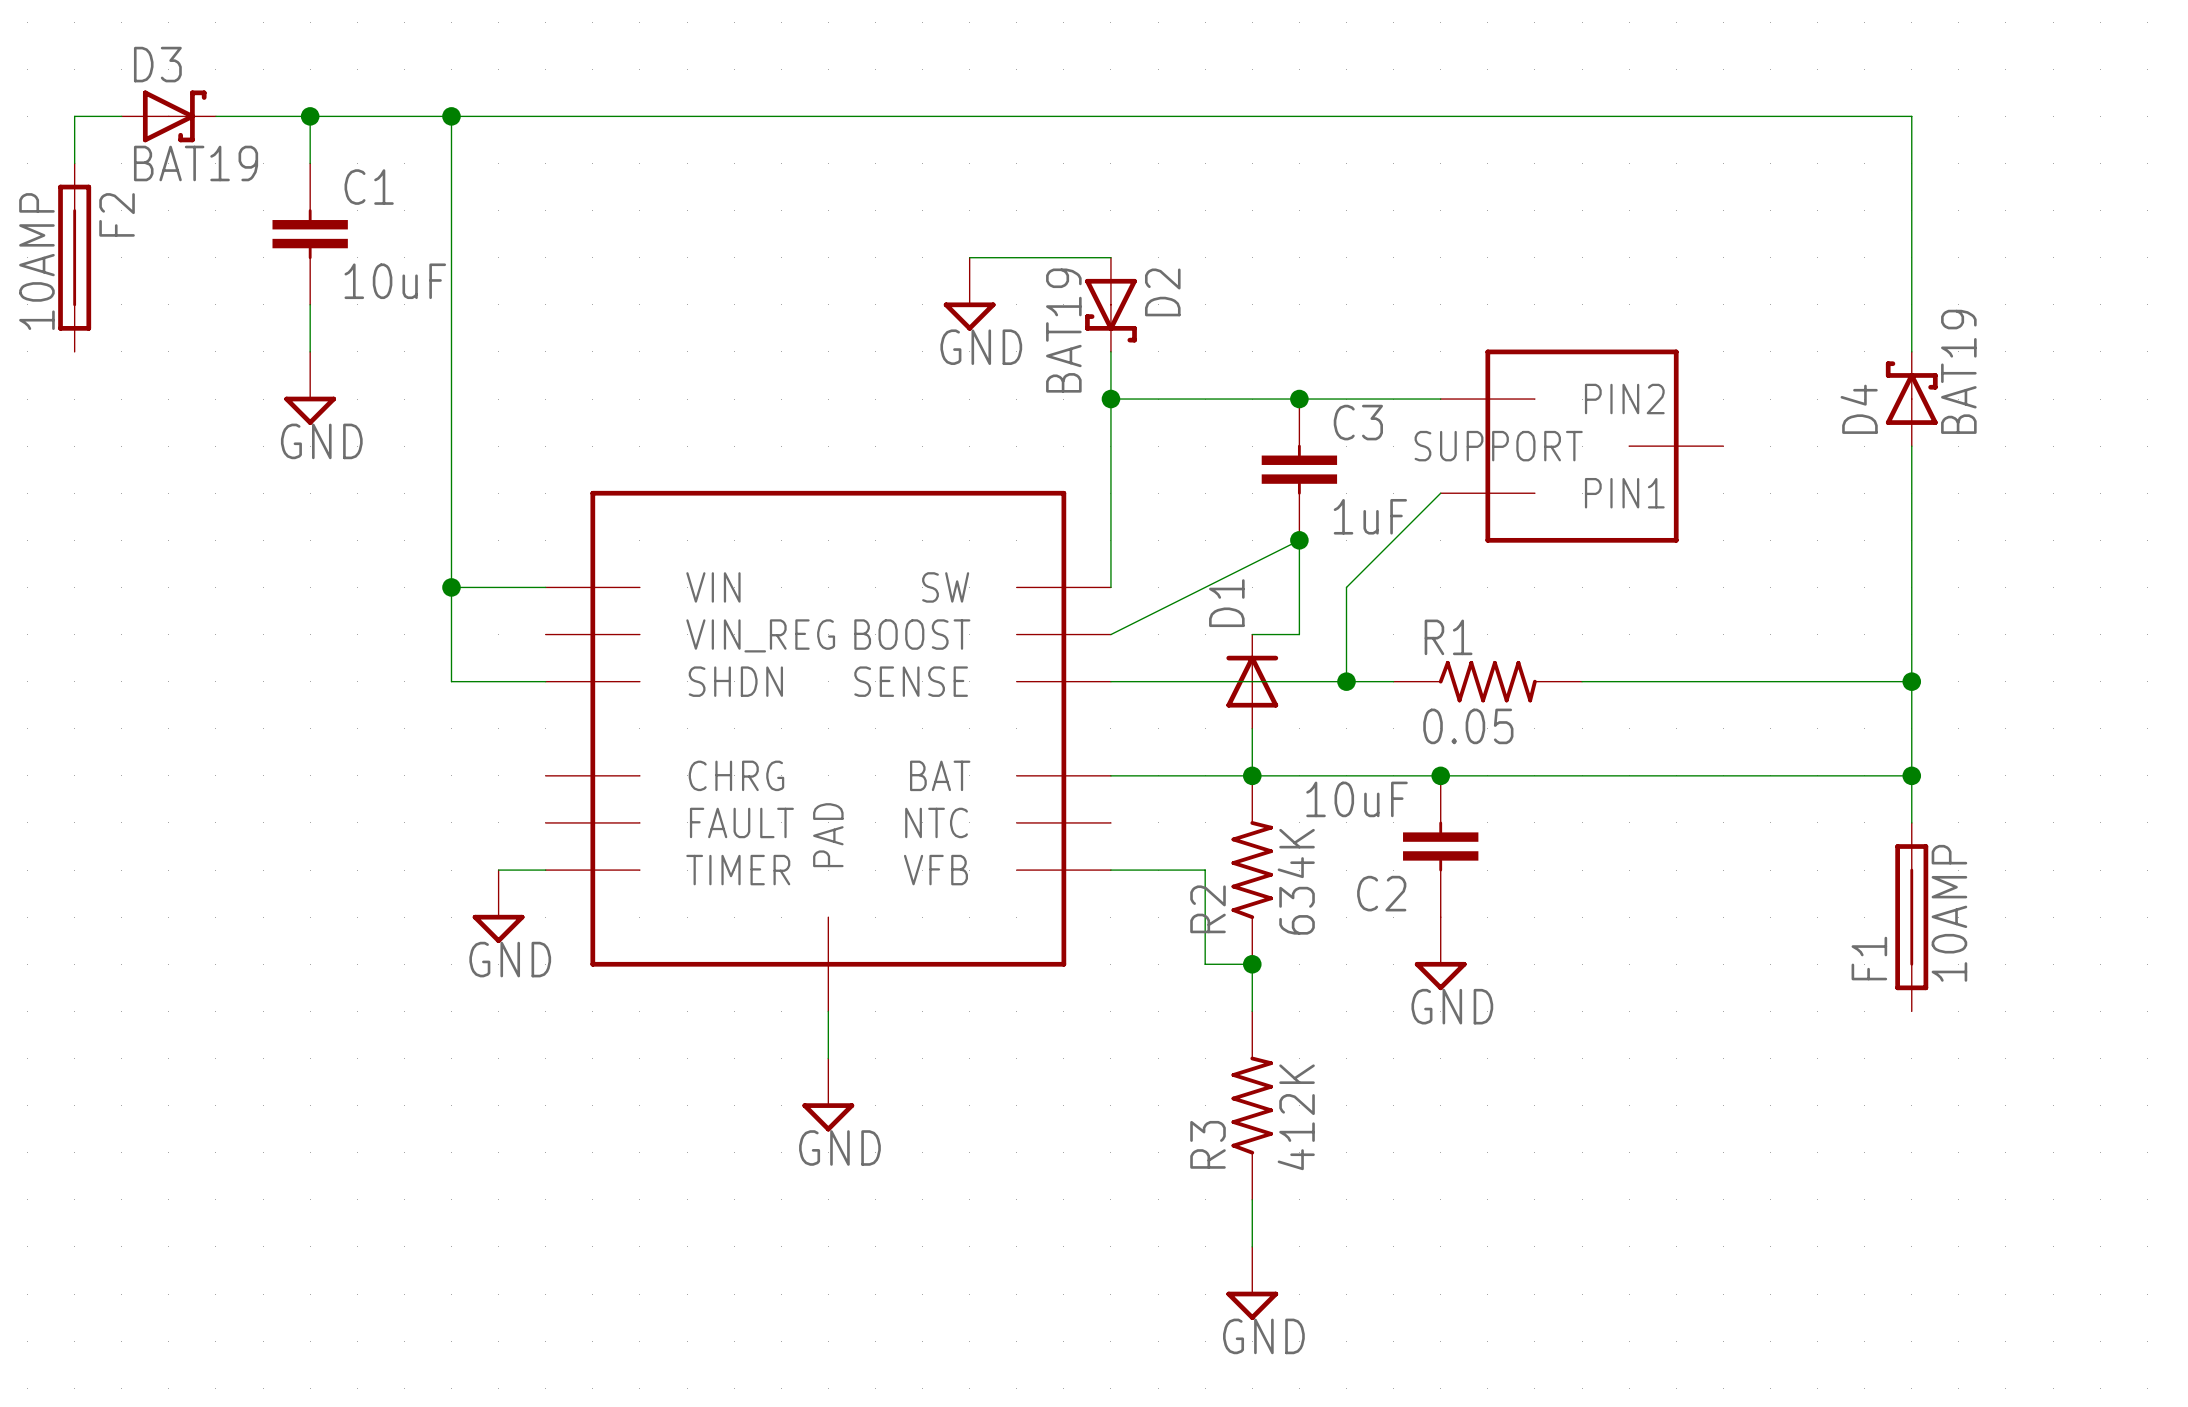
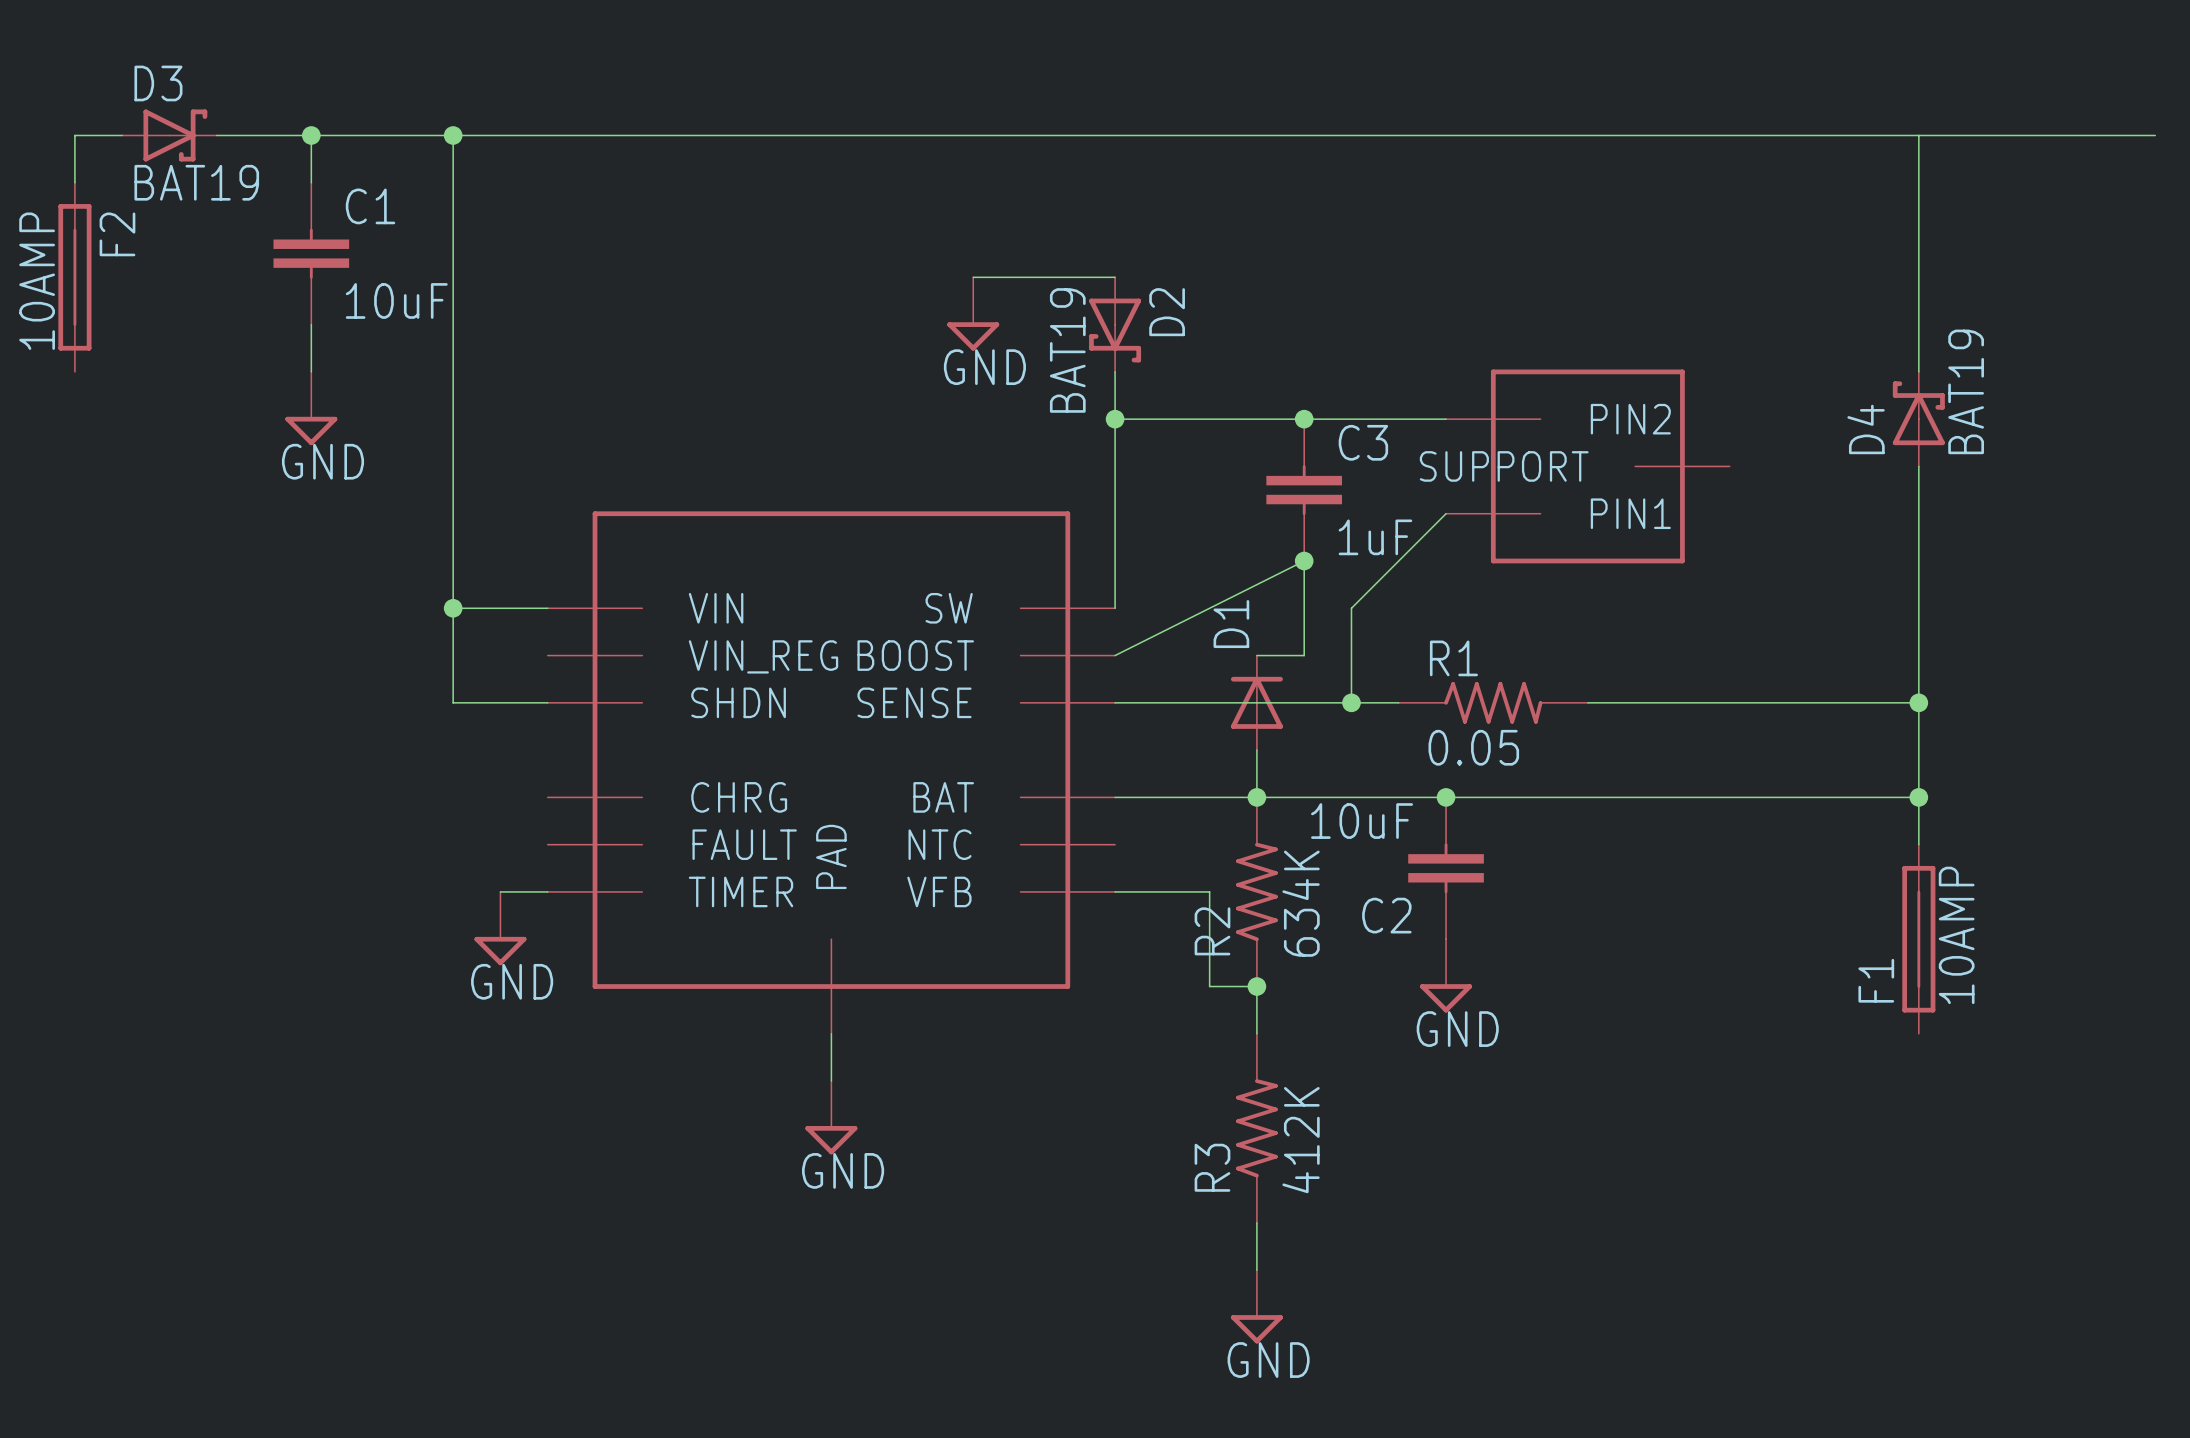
wire: none -> (1918, 135) (2155, 135)

